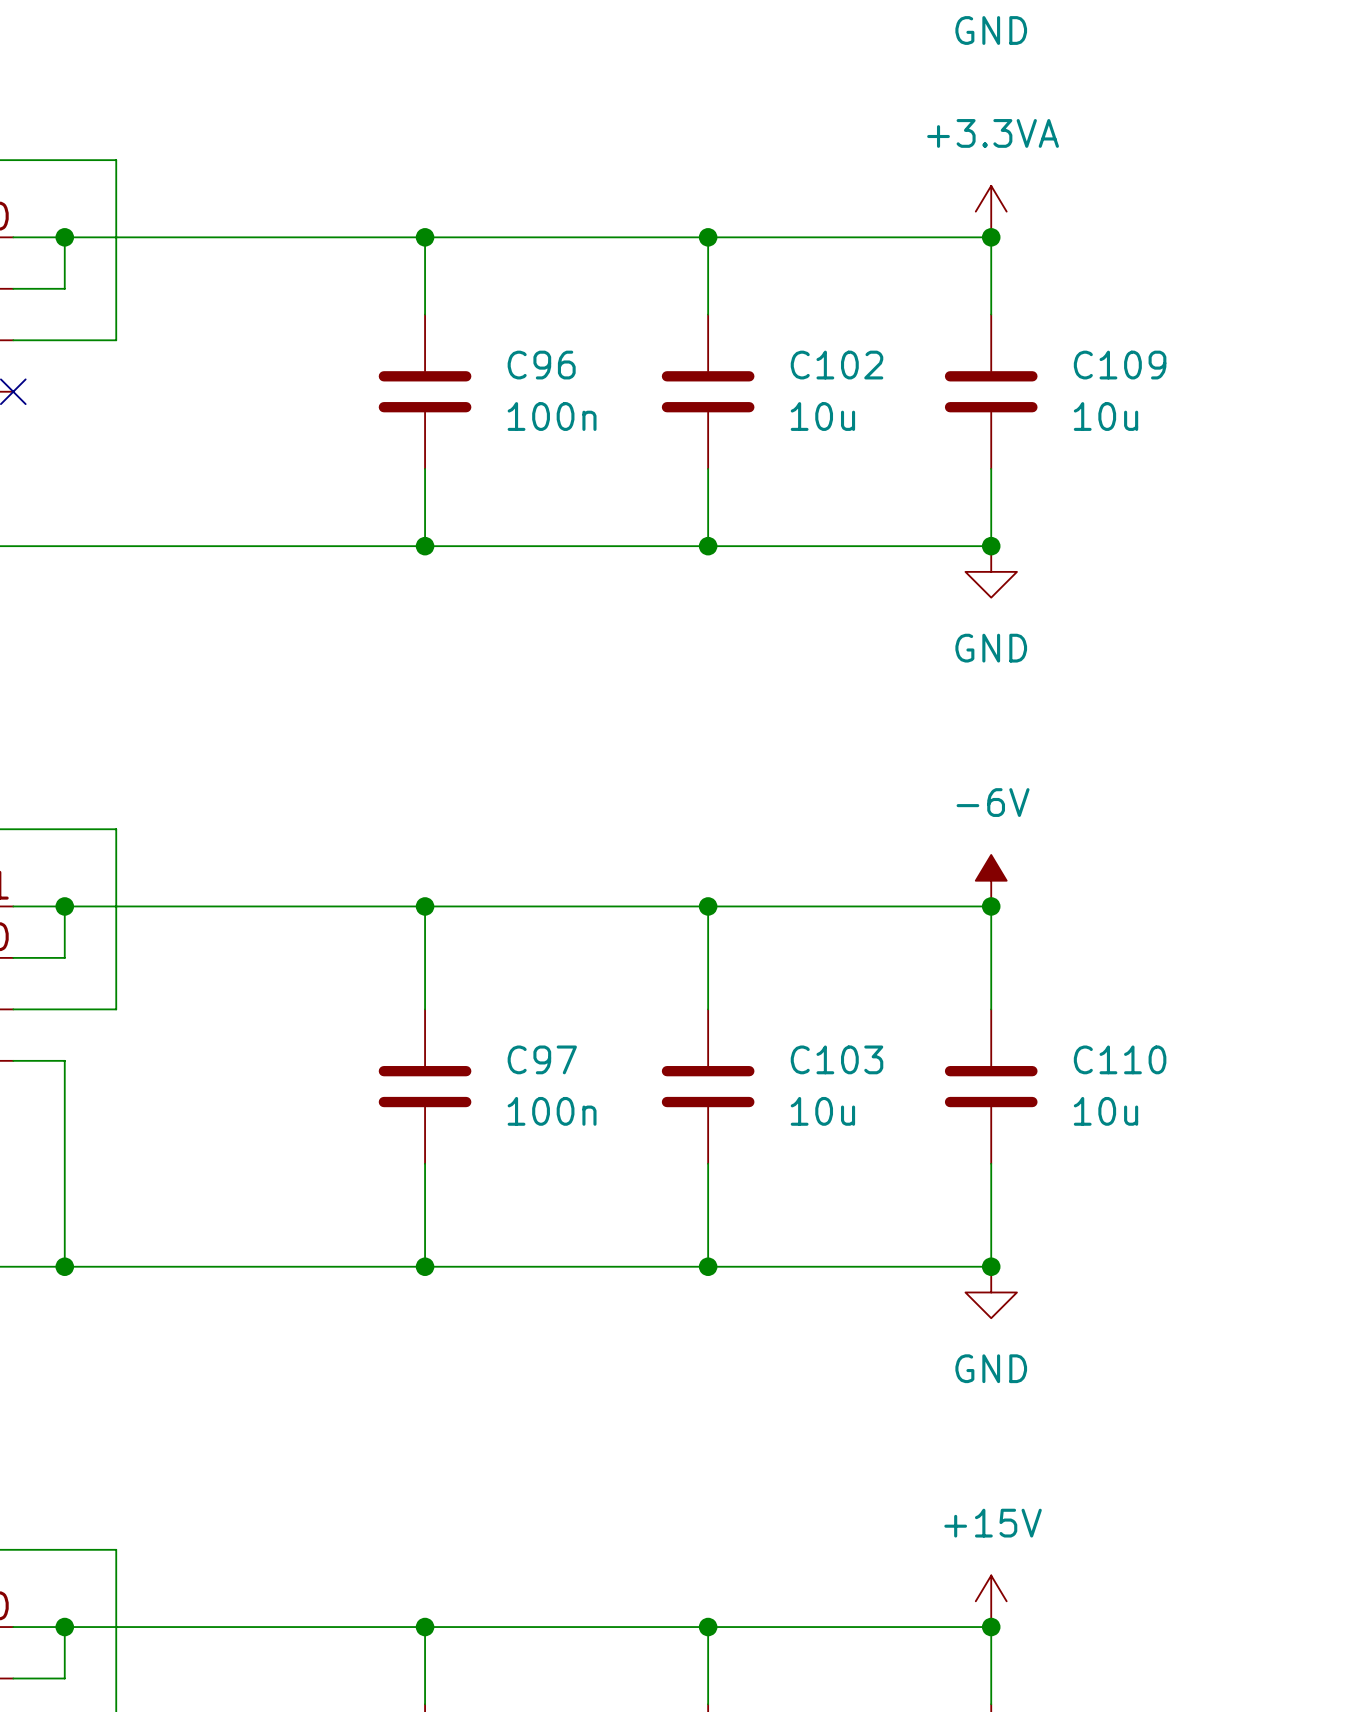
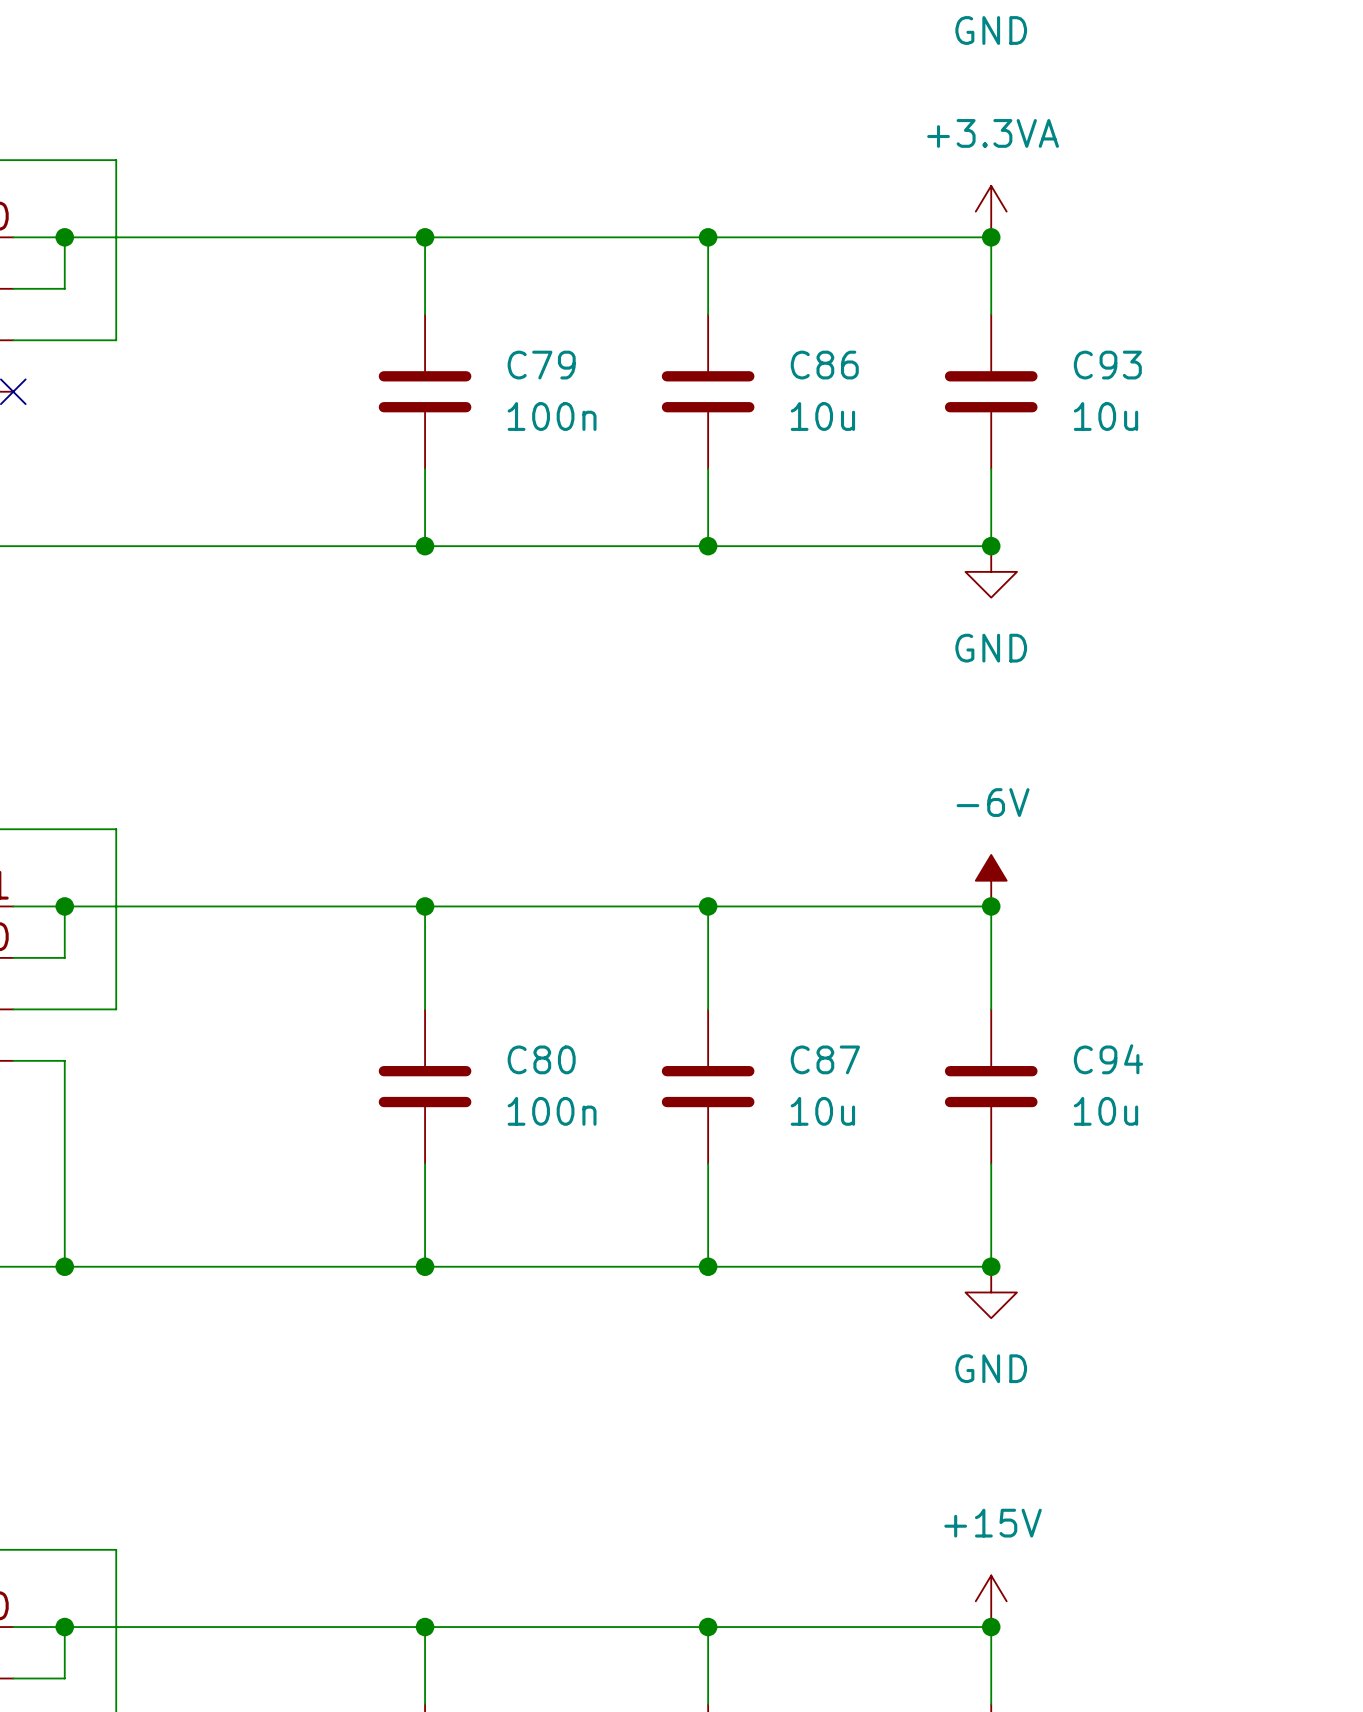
C96 name: C96 (541, 365) -> C79 (541, 365)
C102 name: C102 (837, 365) -> C86 (824, 365)
C109 name: C109 (1120, 365) -> C93 (1107, 365)
C97 name: C97 (542, 1059) -> C80 (541, 1059)
C103 name: C103 (837, 1059) -> C87 (825, 1059)
C110 name: C110 (1120, 1059) -> C94 (1108, 1059)

